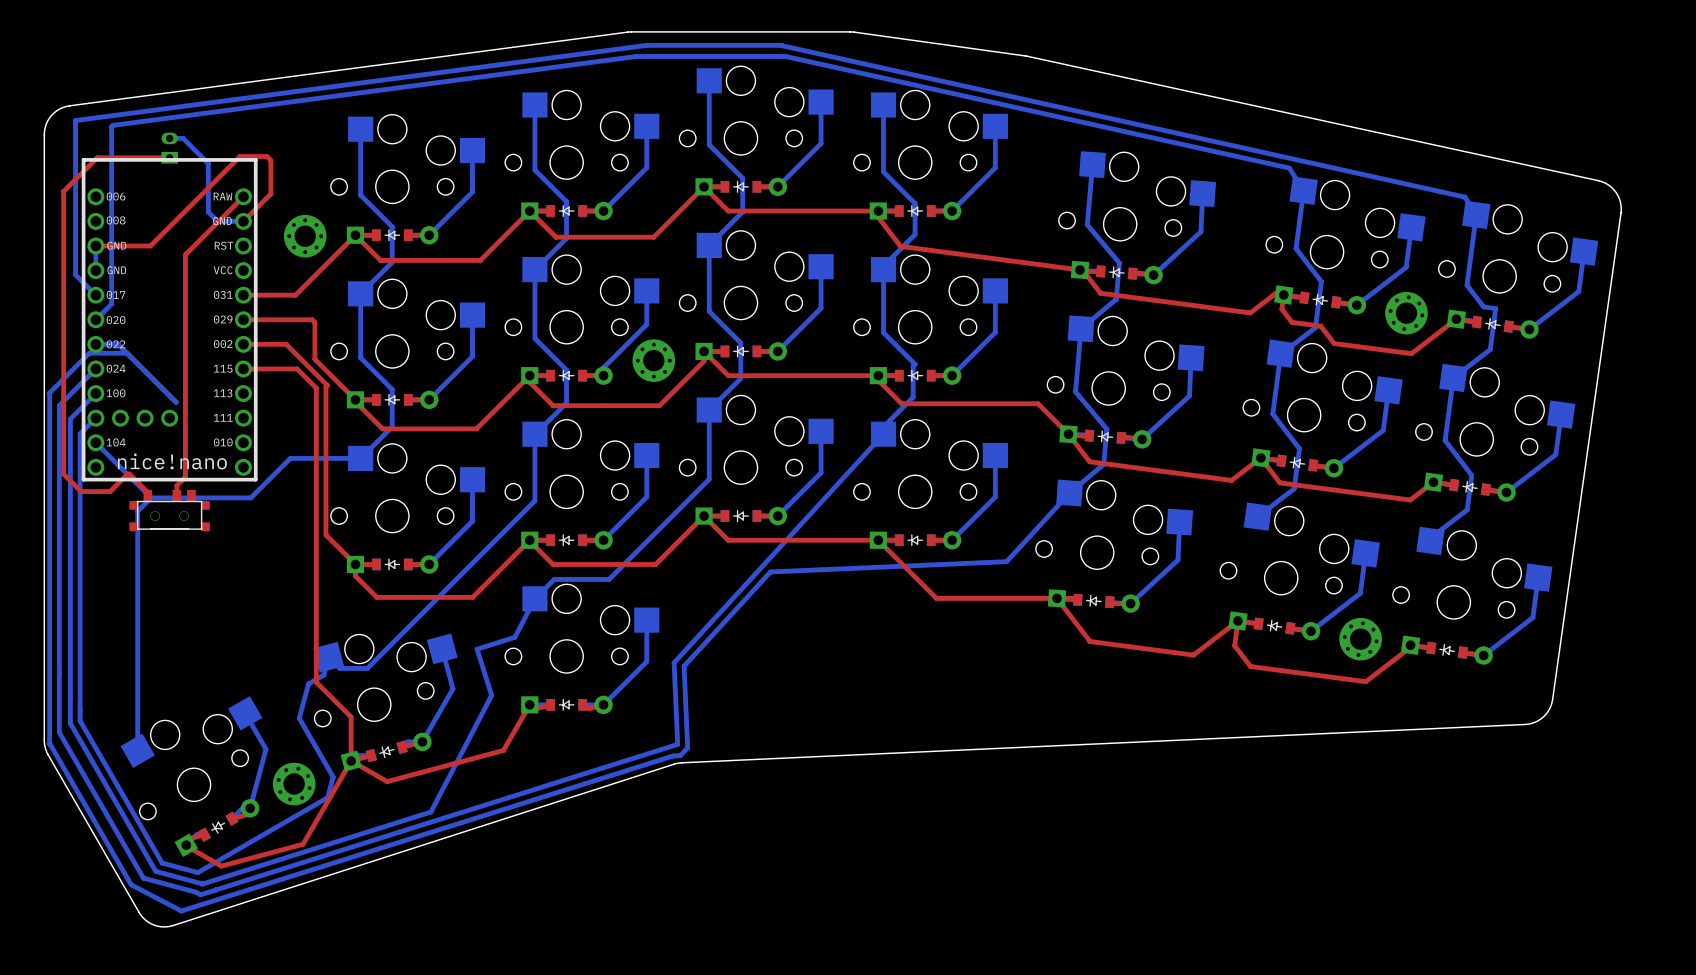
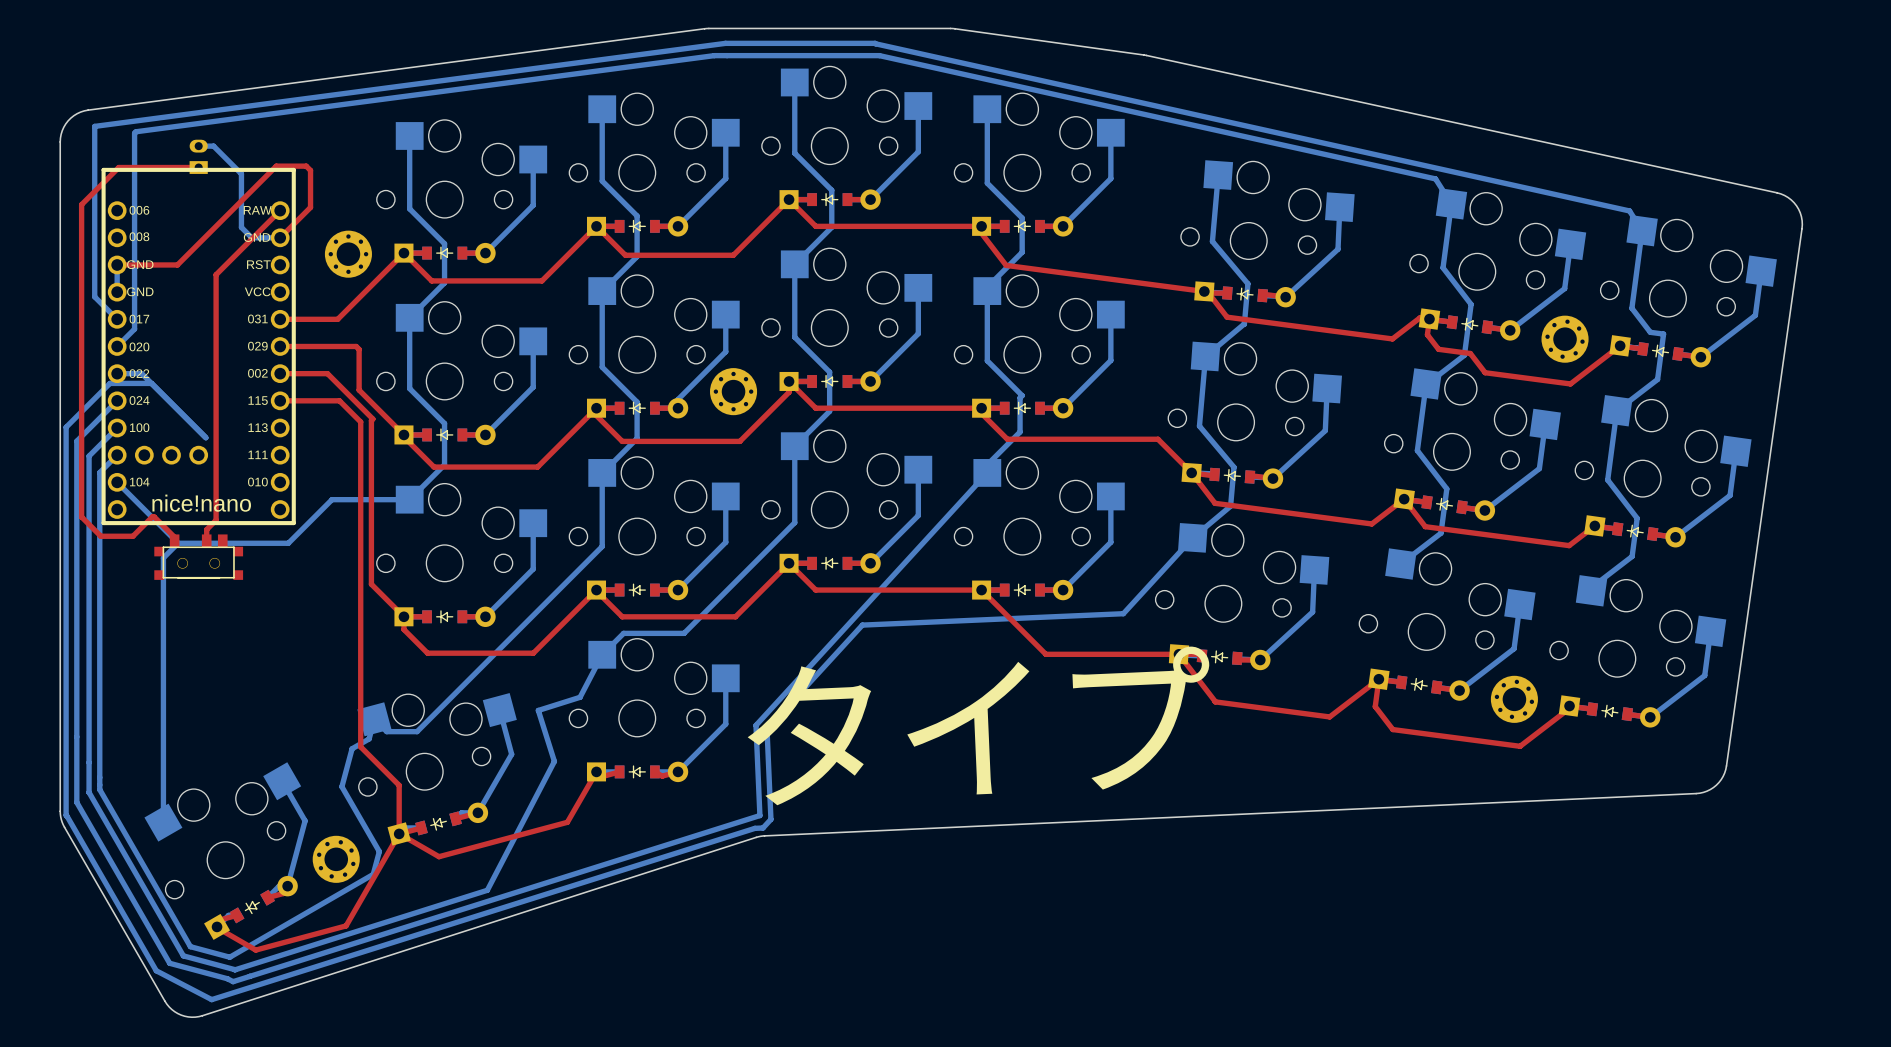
text: none -> タイプ (978, 725)

